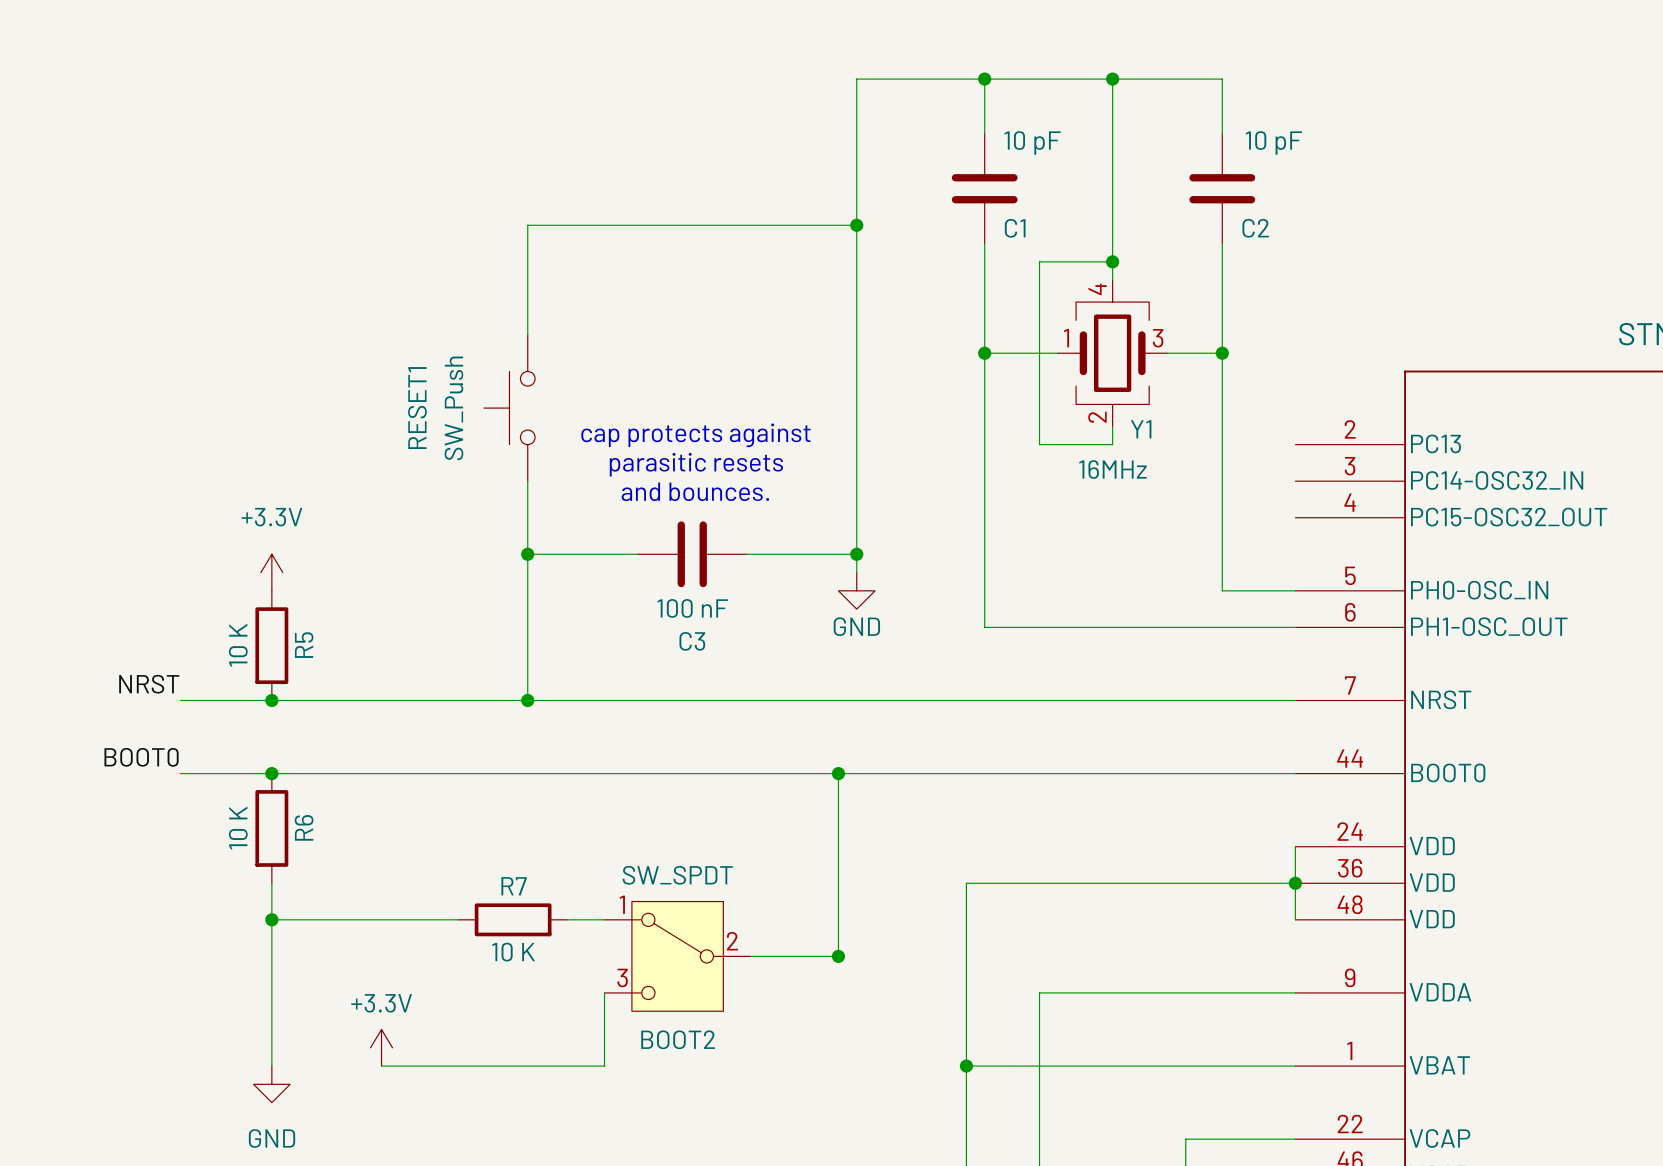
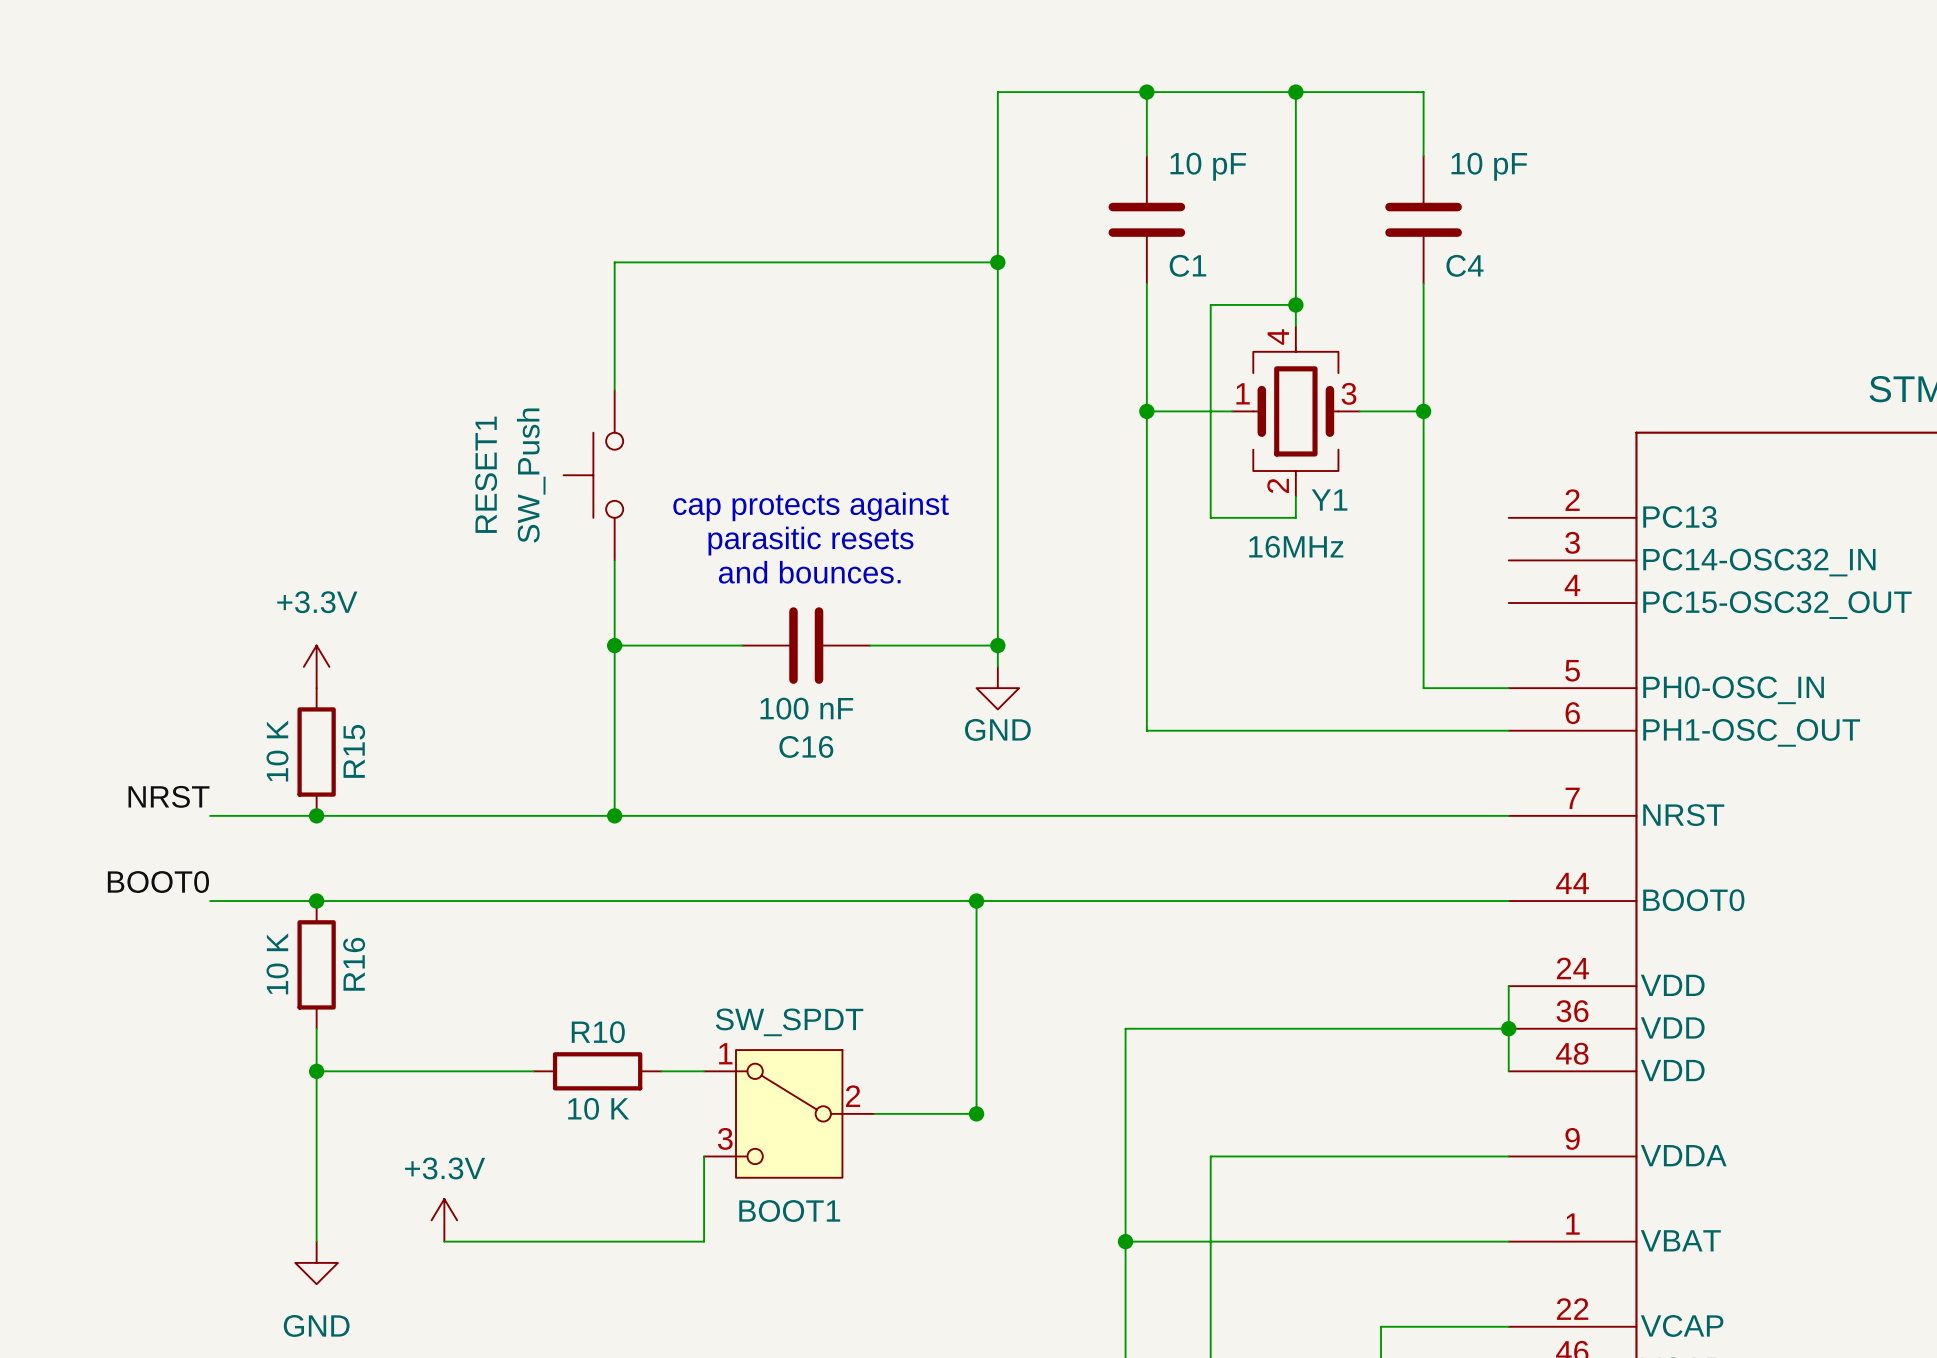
C2 name: C2 (1255, 228) -> C4 (1464, 265)
C3 name: C3 (692, 641) -> C16 (806, 746)
R5 name: R5 (304, 645) -> R15 (354, 751)
R6 name: R6 (304, 827) -> R16 (354, 964)
R7 name: R7 (514, 886) -> R10 (598, 1032)
BOOT2 name: BOOT2 (678, 1039) -> BOOT1 (789, 1211)

